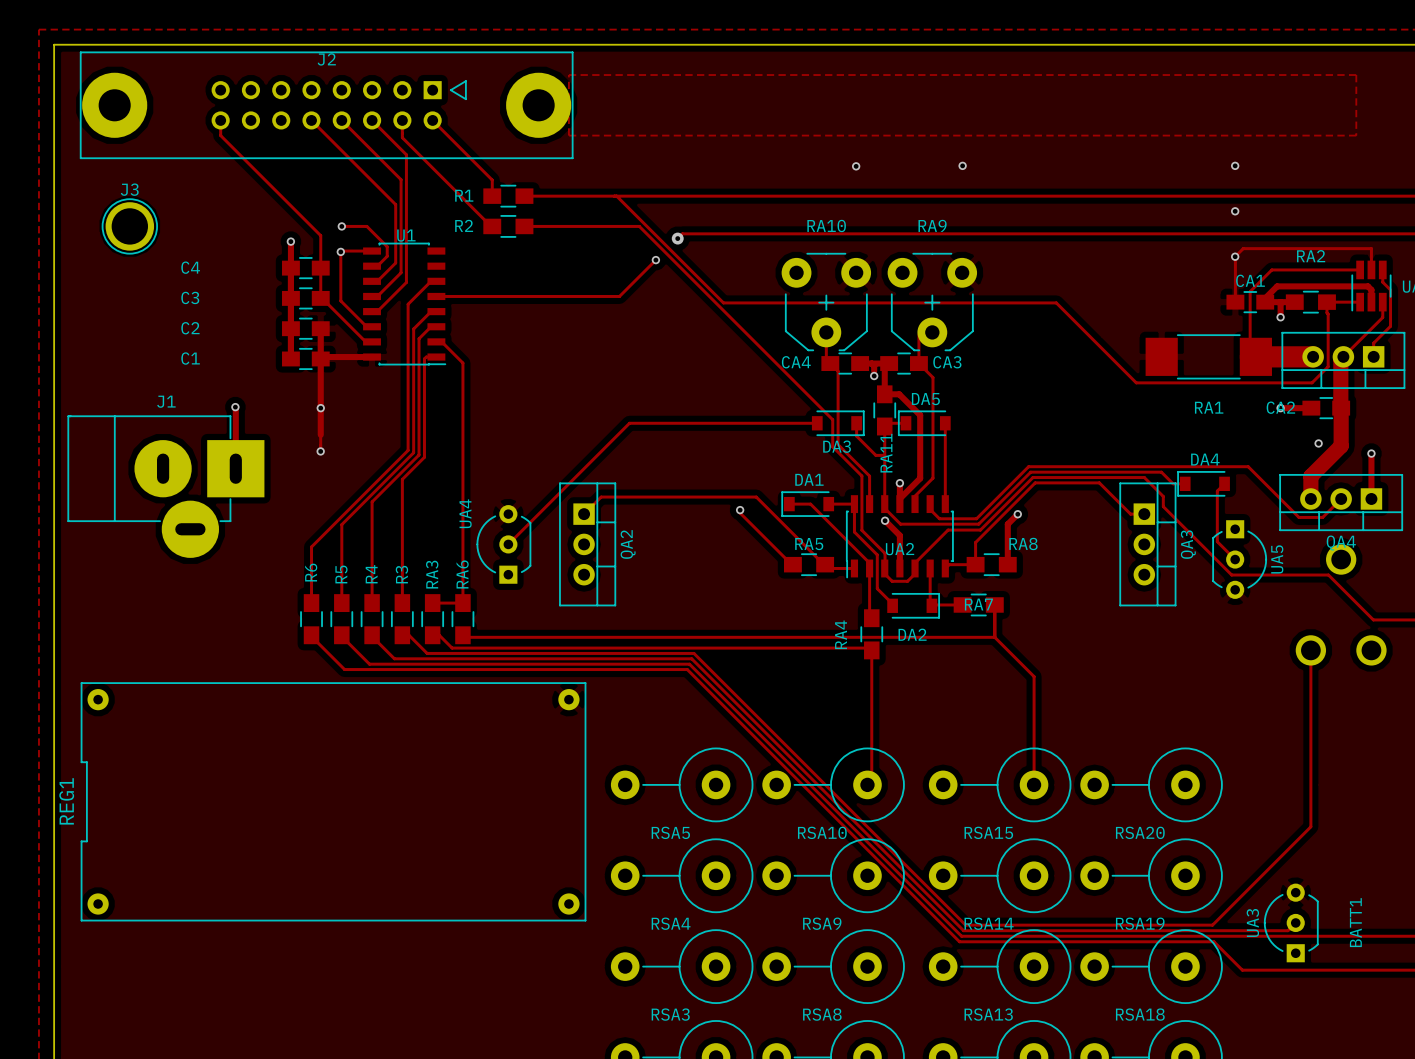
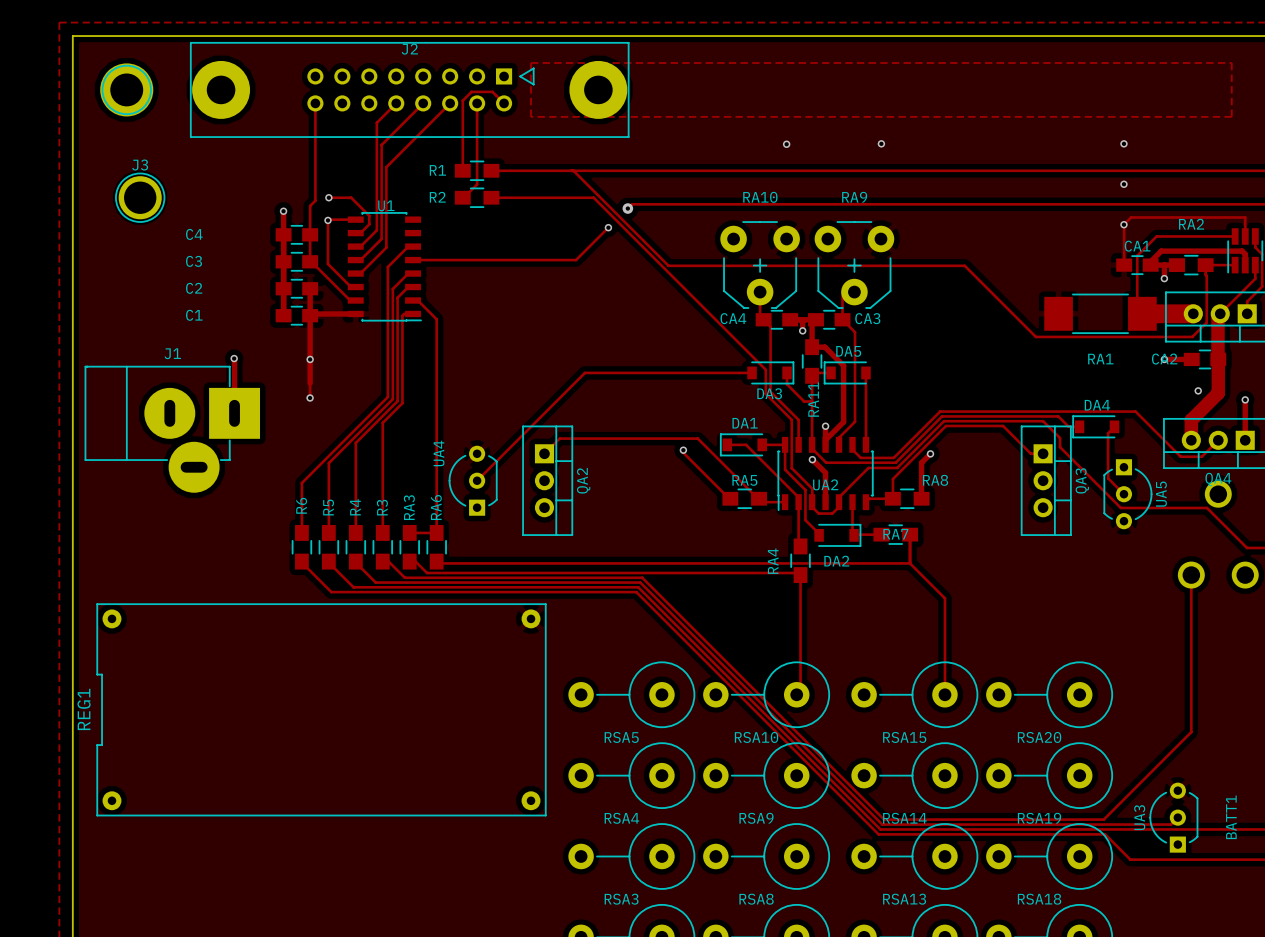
part: none -> (126, 89)
J2 position: (326, 105) -> (409, 89)
track: (220, 120) (220, 135) (320, 235) -> (315, 103) (315, 200) (310, 205)
track: (311, 120) (395, 204) -> (396, 103) (376, 122) (376, 178)
track: (341, 120) (401, 179) -> (423, 103) (381, 144) (381, 156)
track: (372, 120) (406, 154) (406, 192) -> (450, 103) (386, 167)
track: (402, 120) (402, 137) (491, 226) -> none
track: (432, 120) (492, 180) -> (504, 103) (492, 91) (471, 91) (462, 100) (462, 156)
track: none -> (477, 103) (477, 184) (462, 197)

